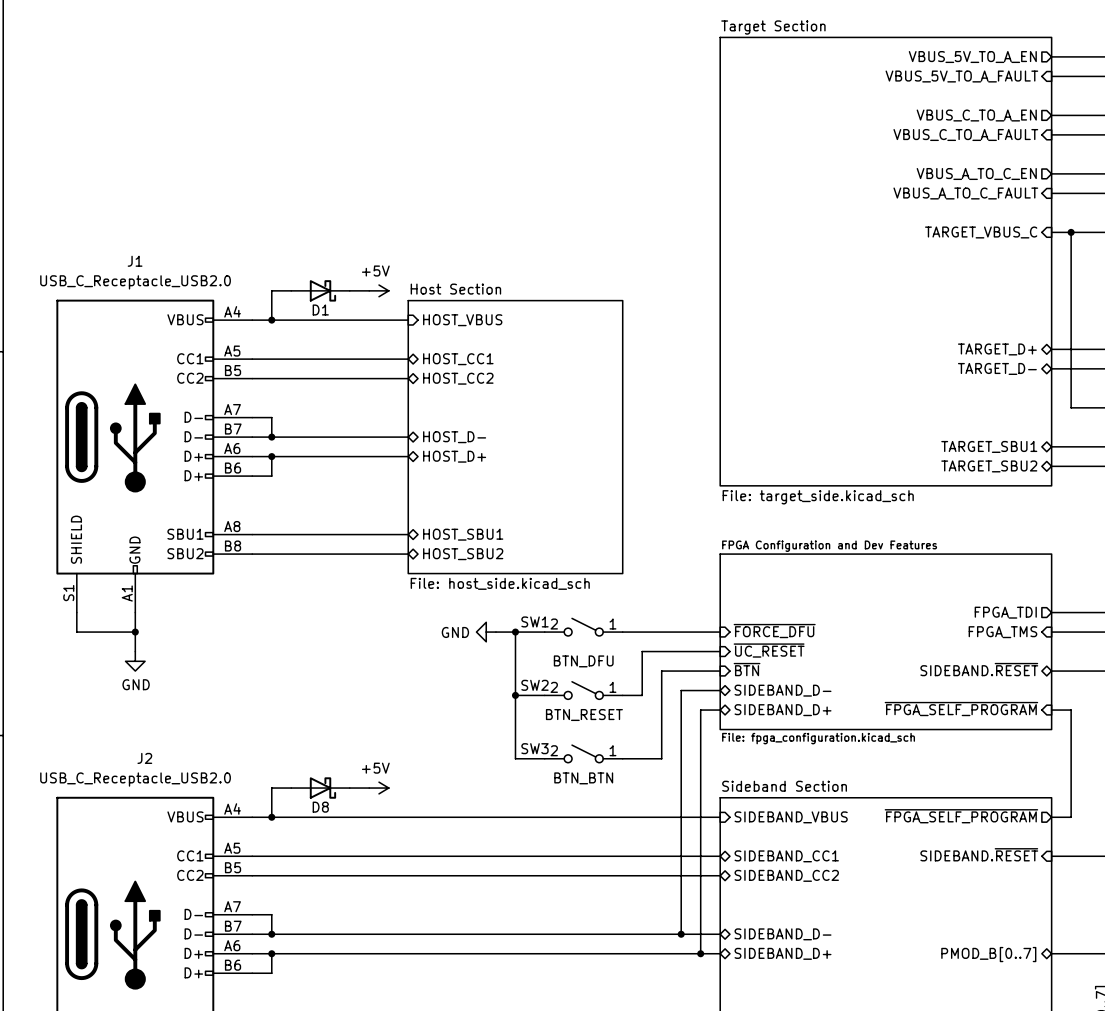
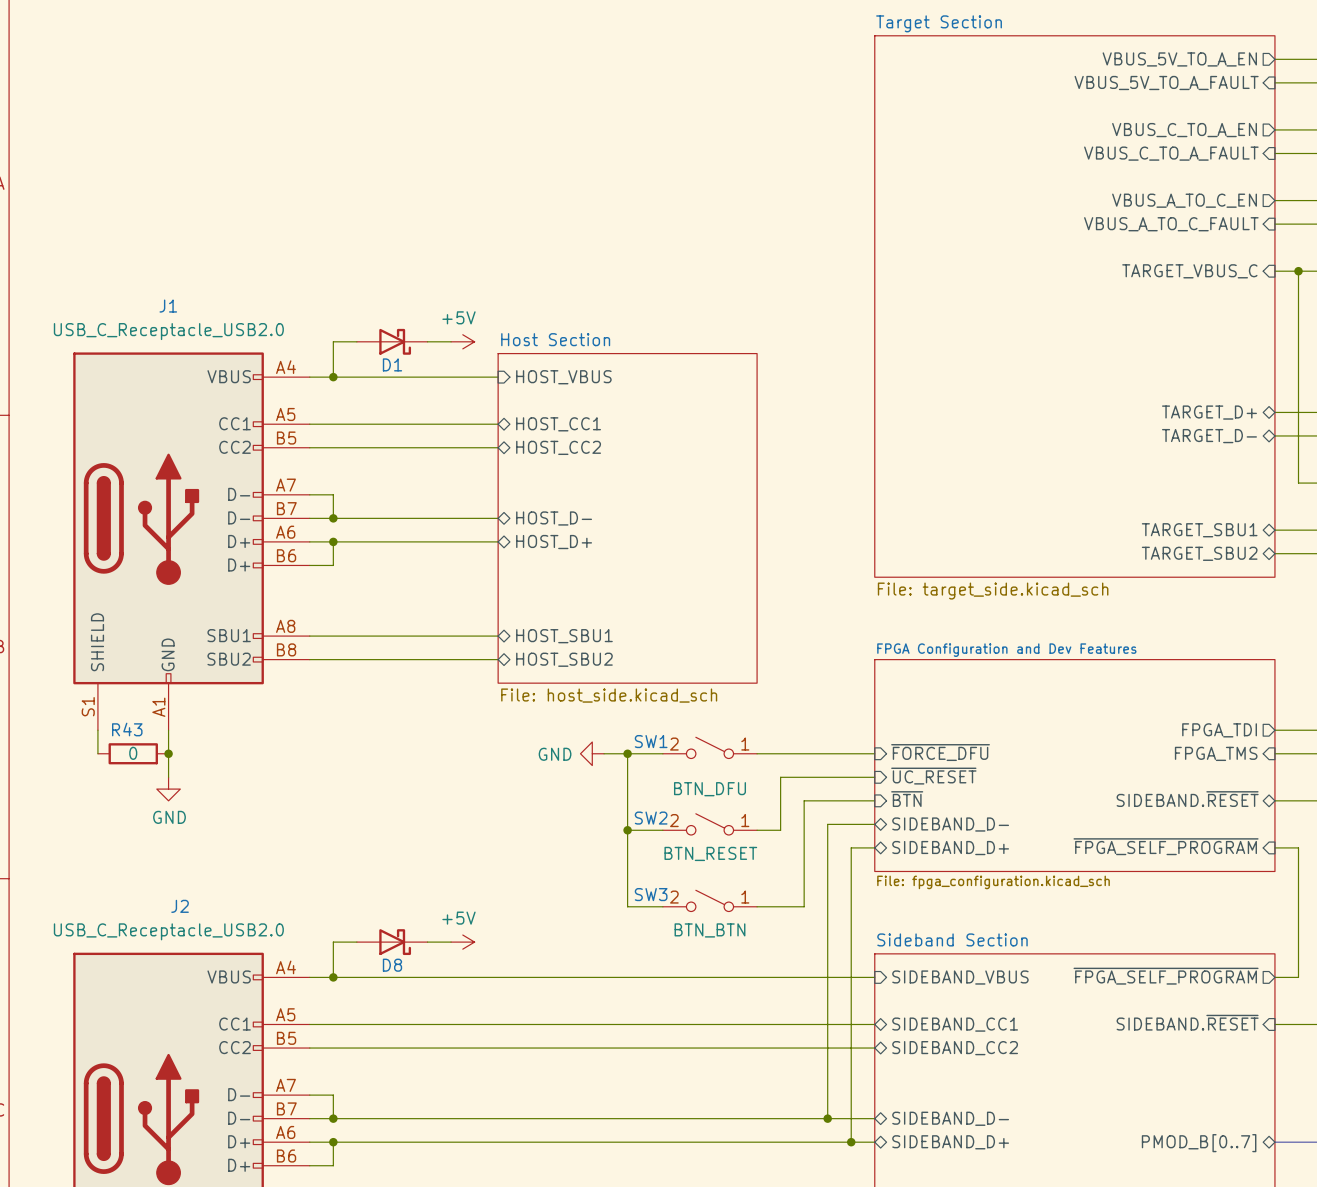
wire: (76, 632) (135, 632) -> none
R43: none -> 0 (133, 753)

